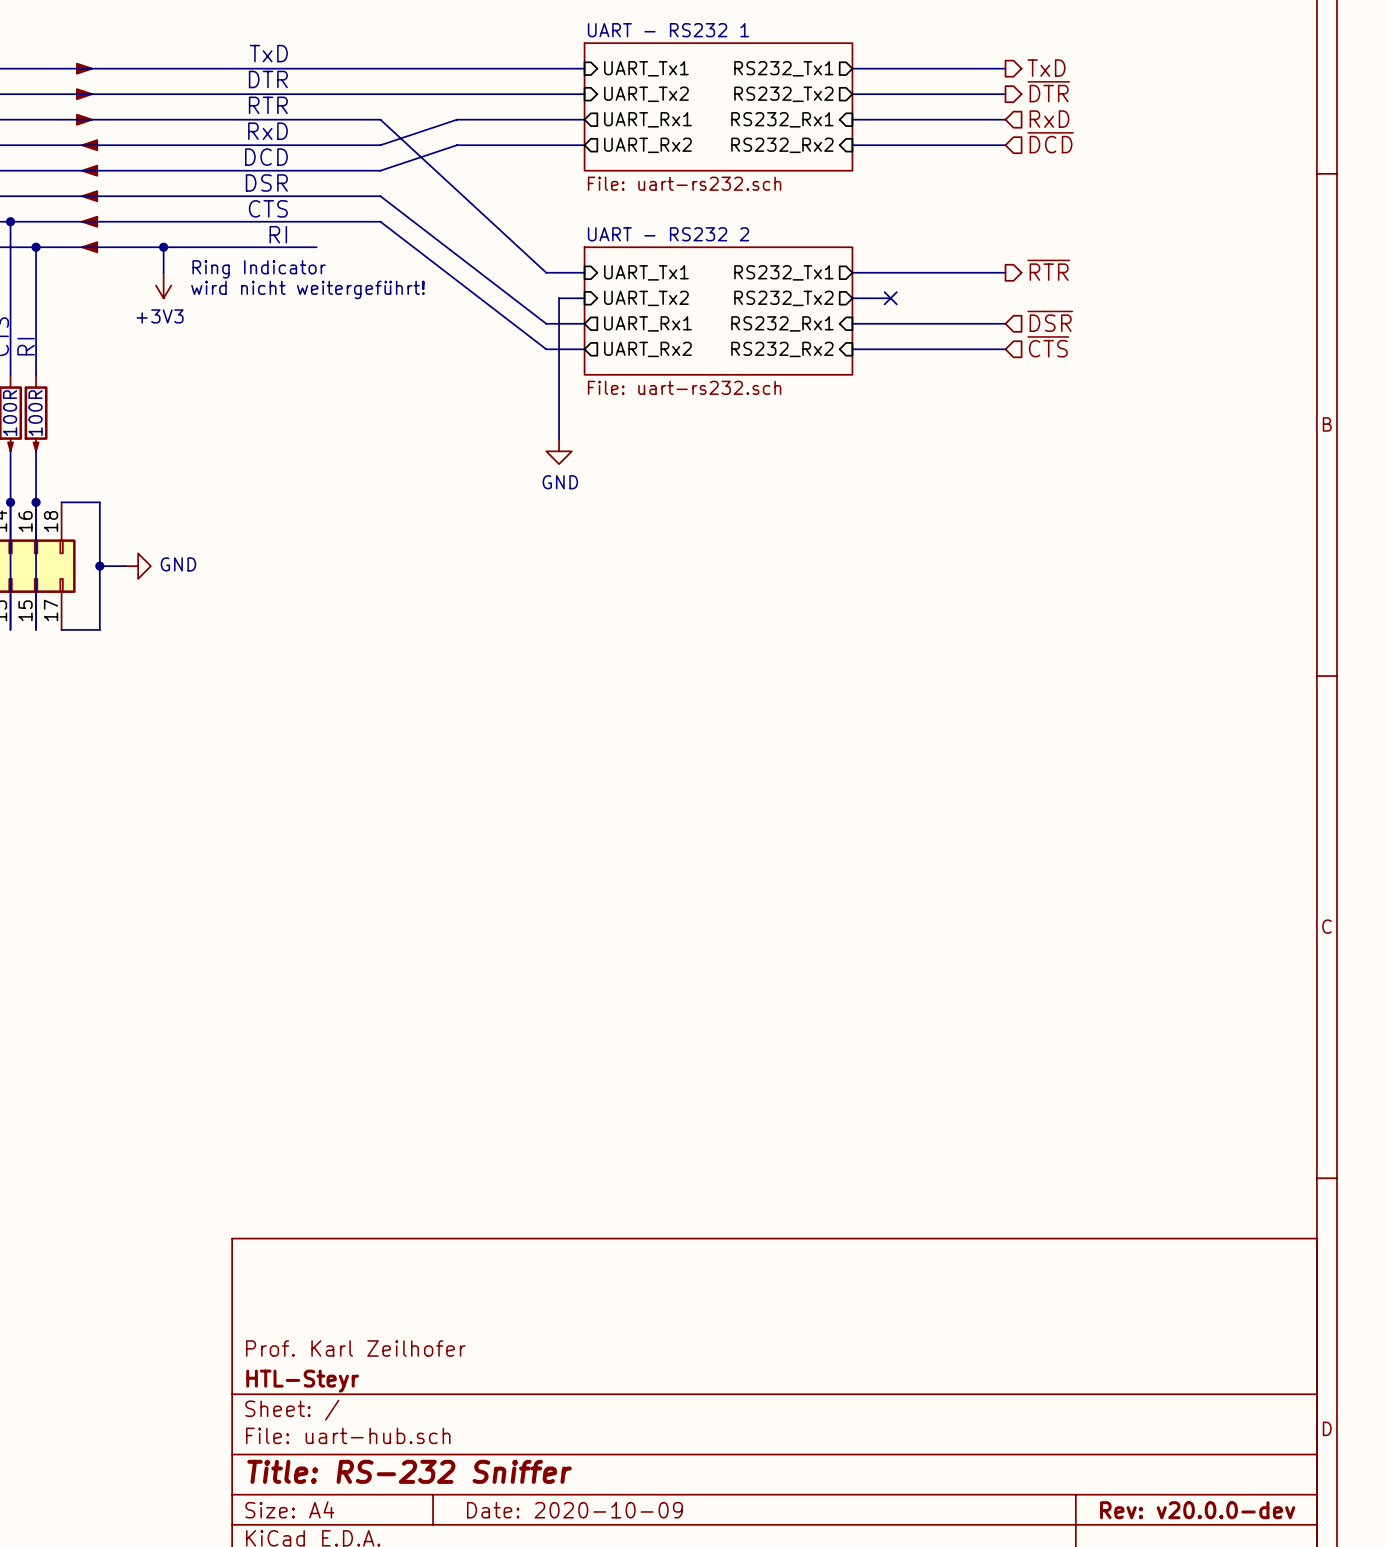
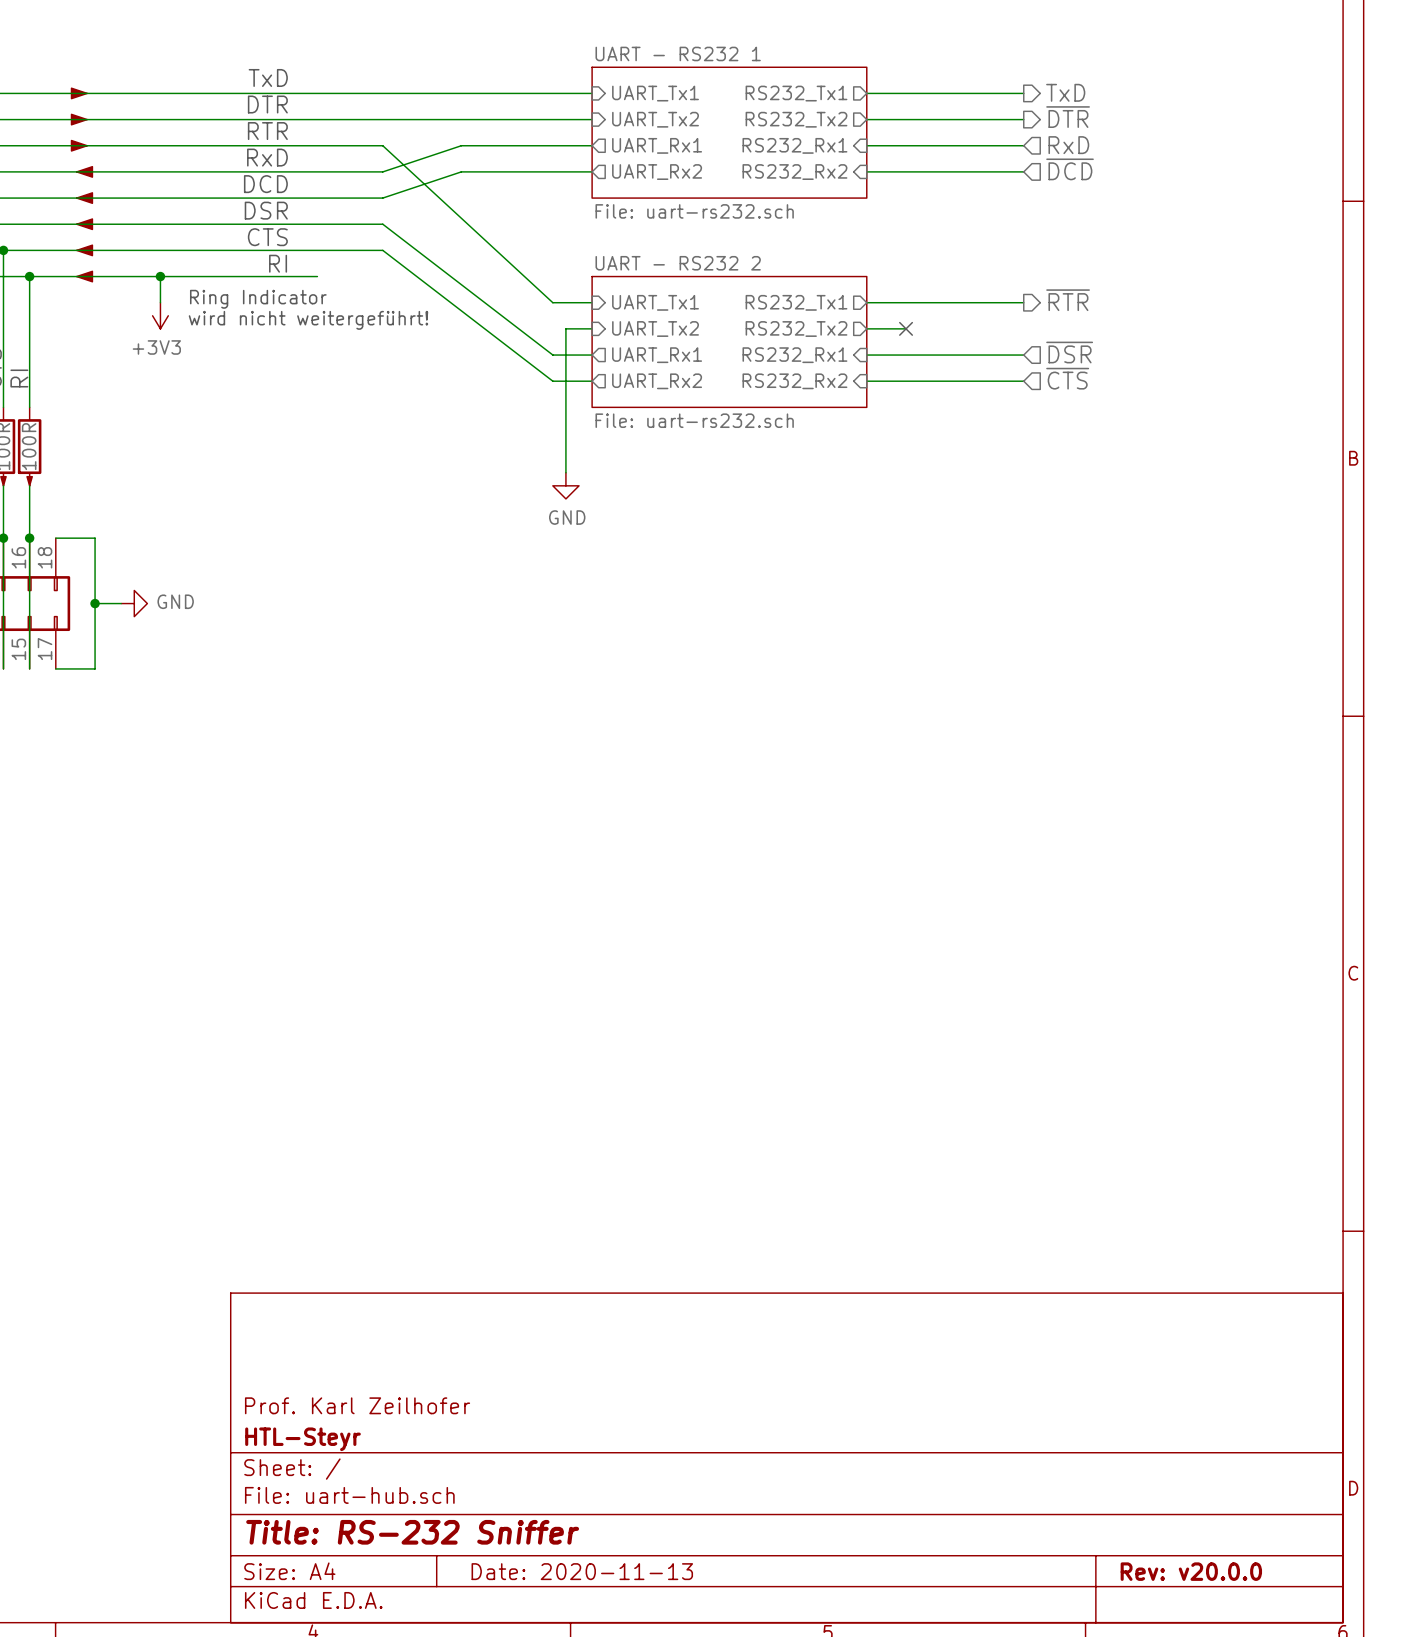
title block: Date: 2020-10-09 (575, 1510) -> Date: 2020-11-13 (582, 1571)
title block: Rev: v20.0.0-dev (1197, 1510) -> Rev: v20.0.0 (1191, 1571)

